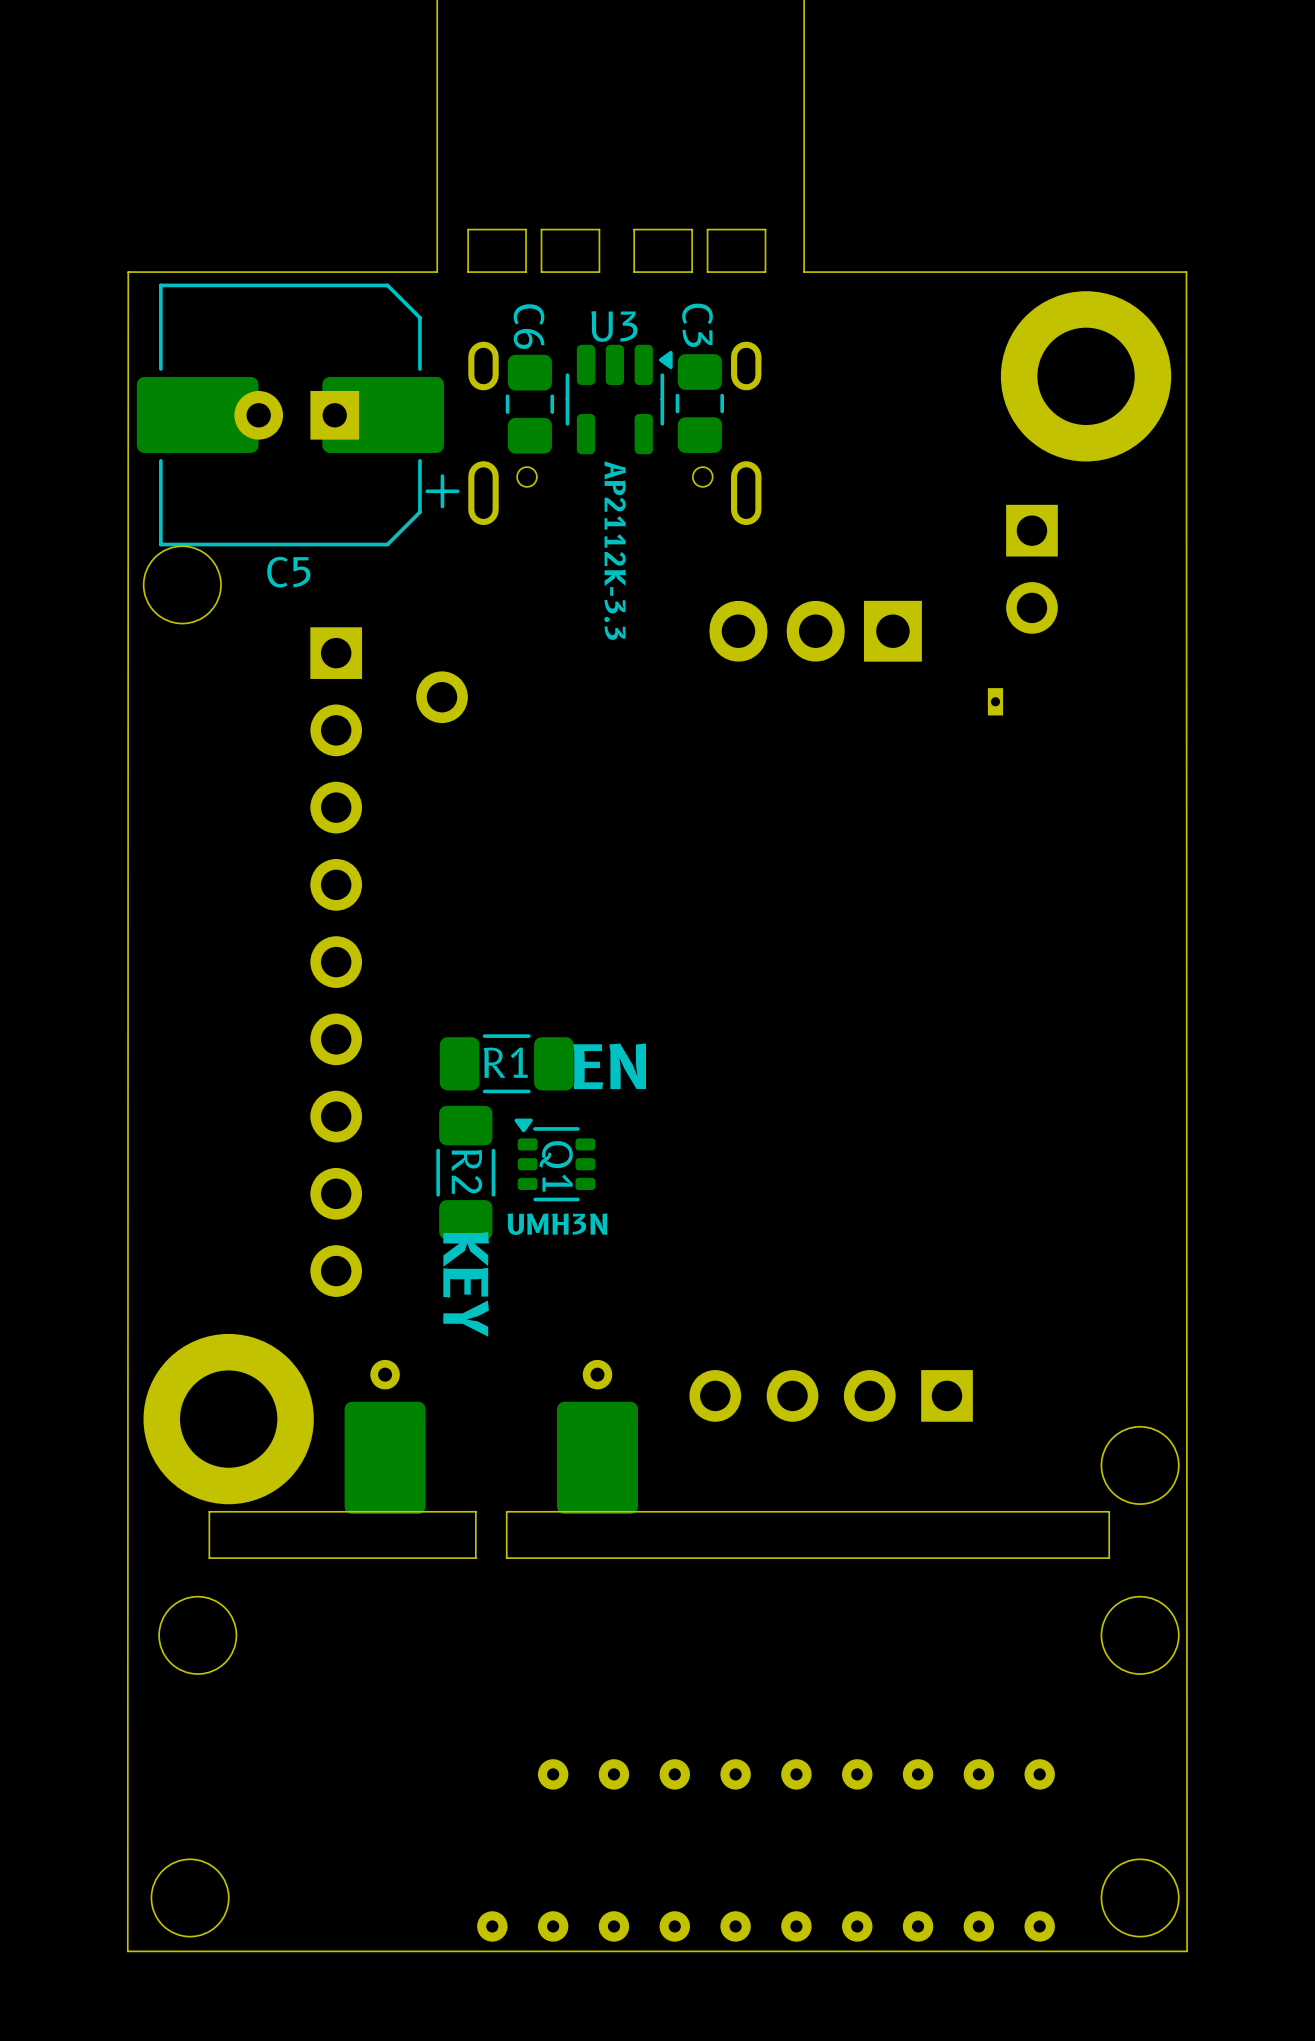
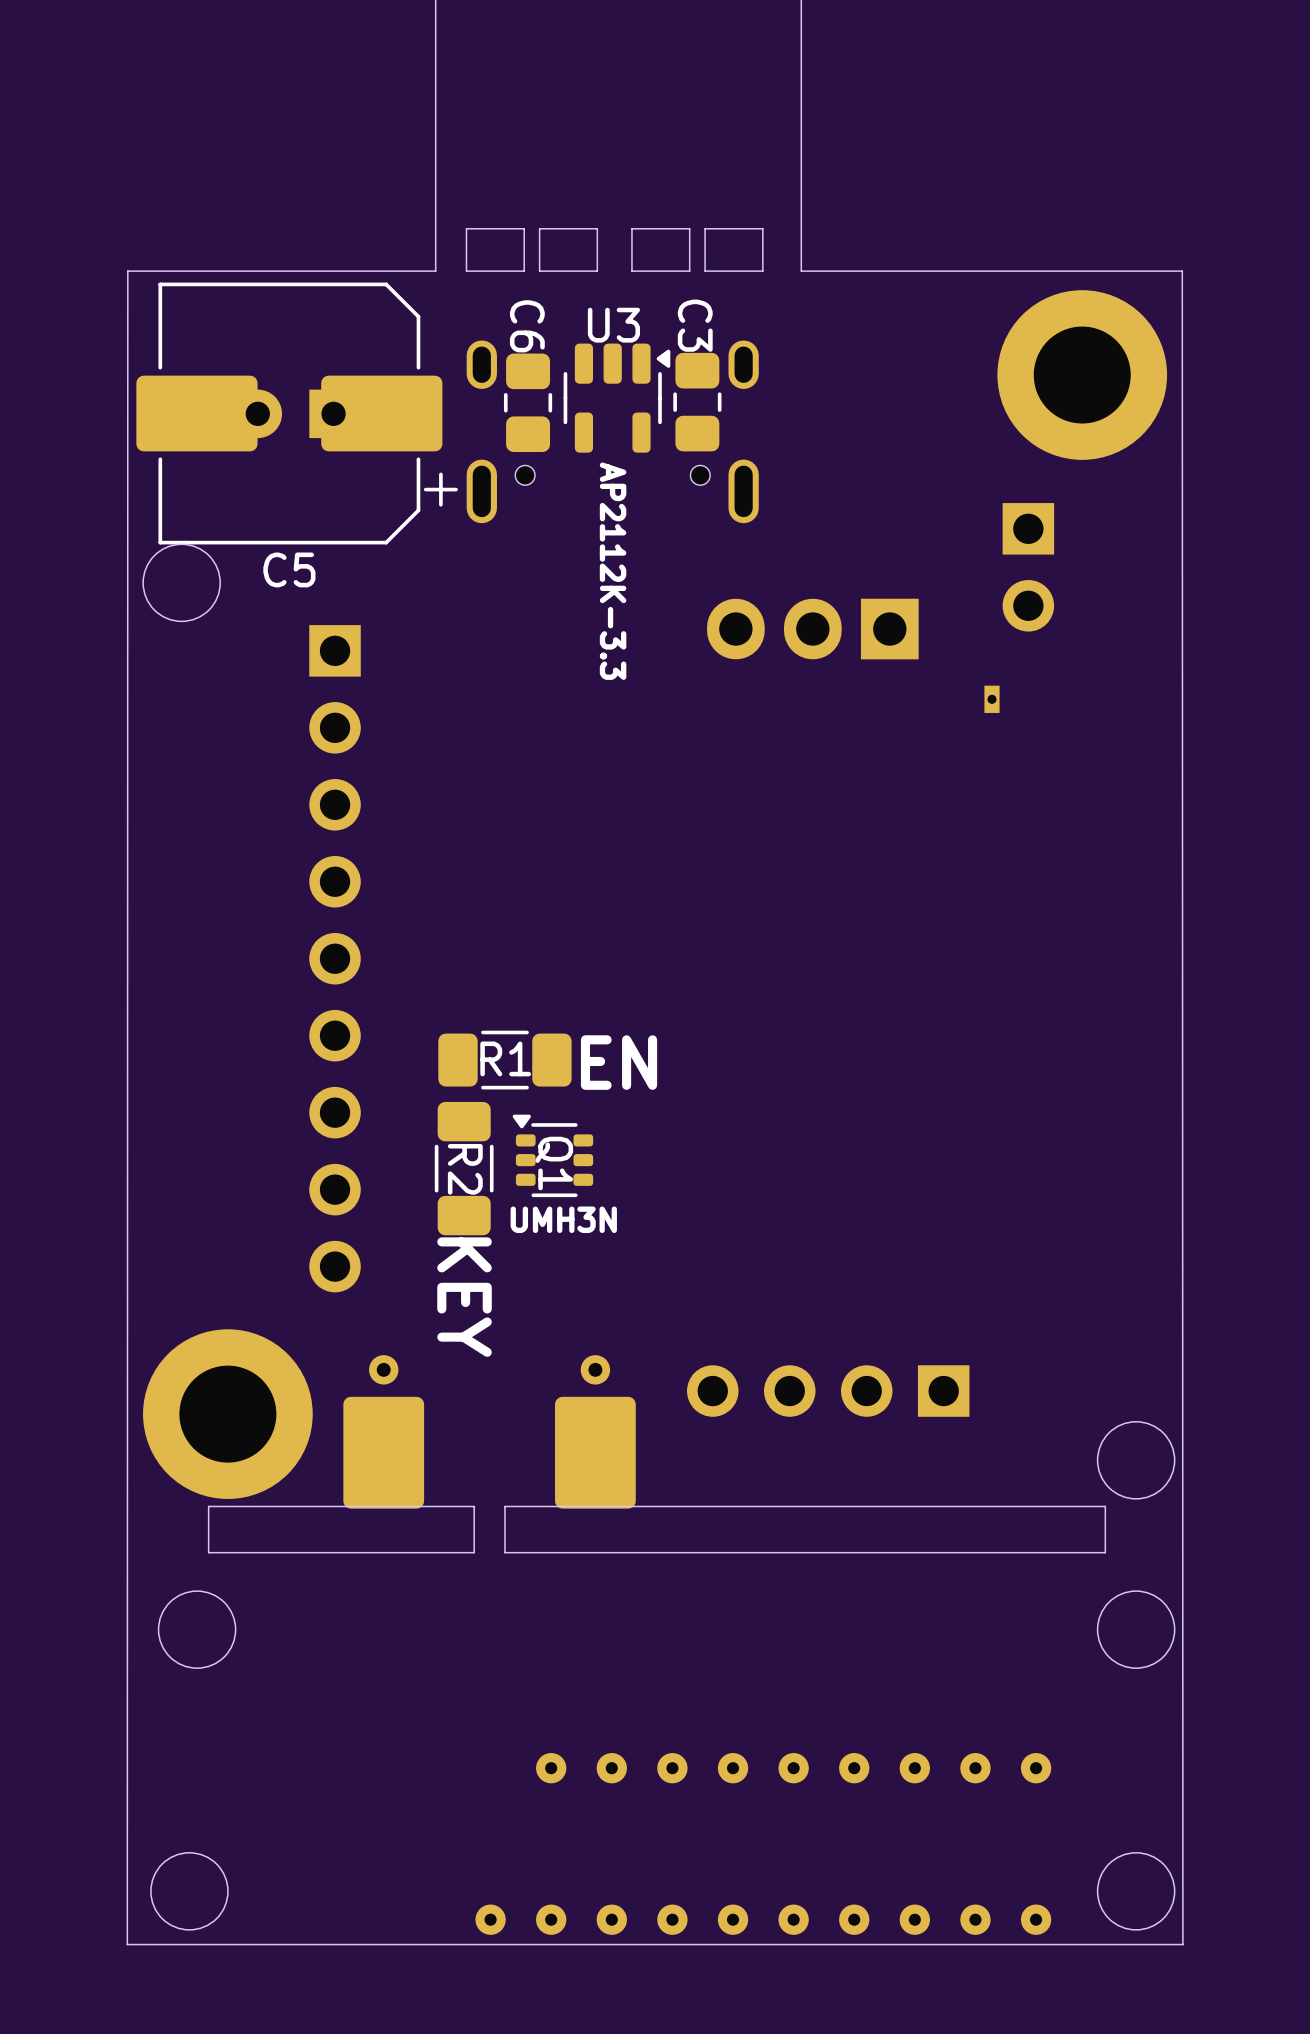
part: (442, 697) -> none

